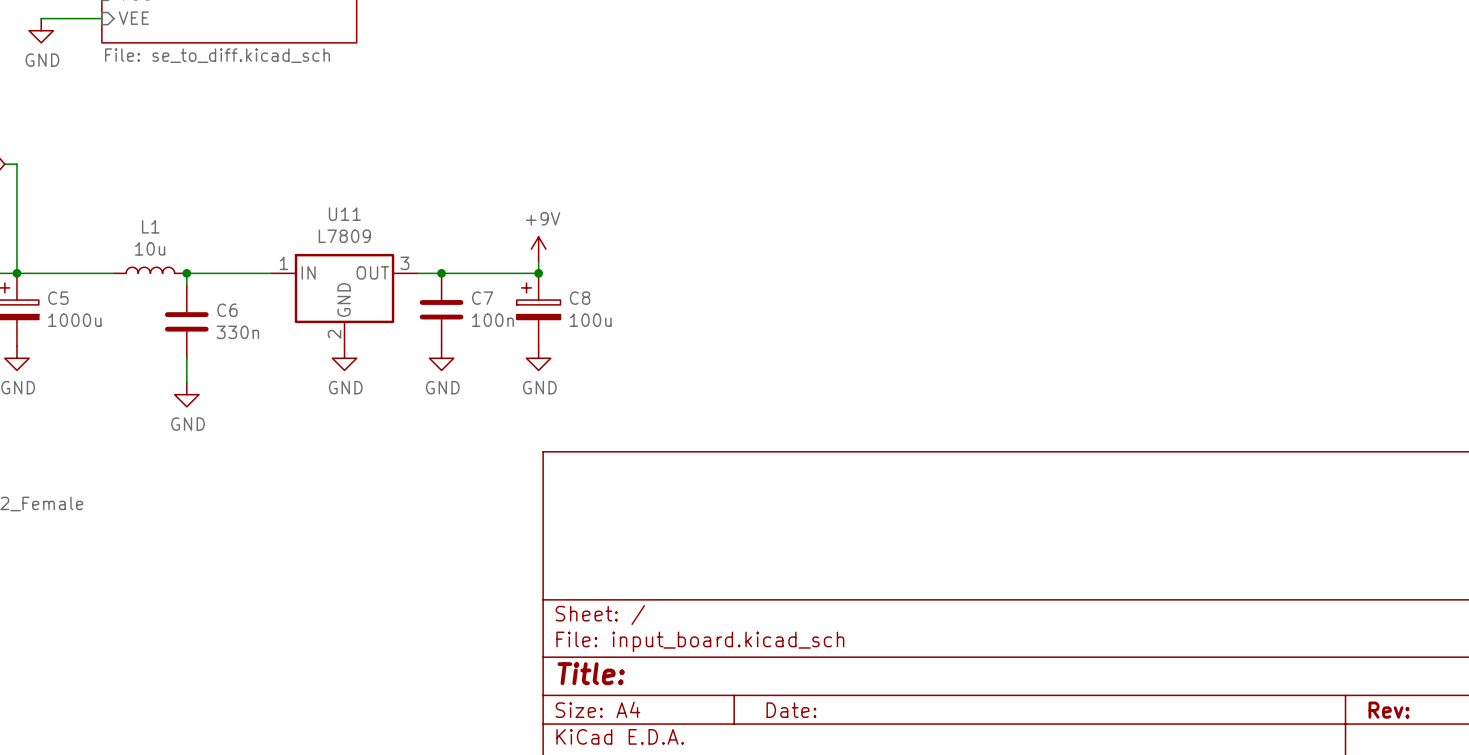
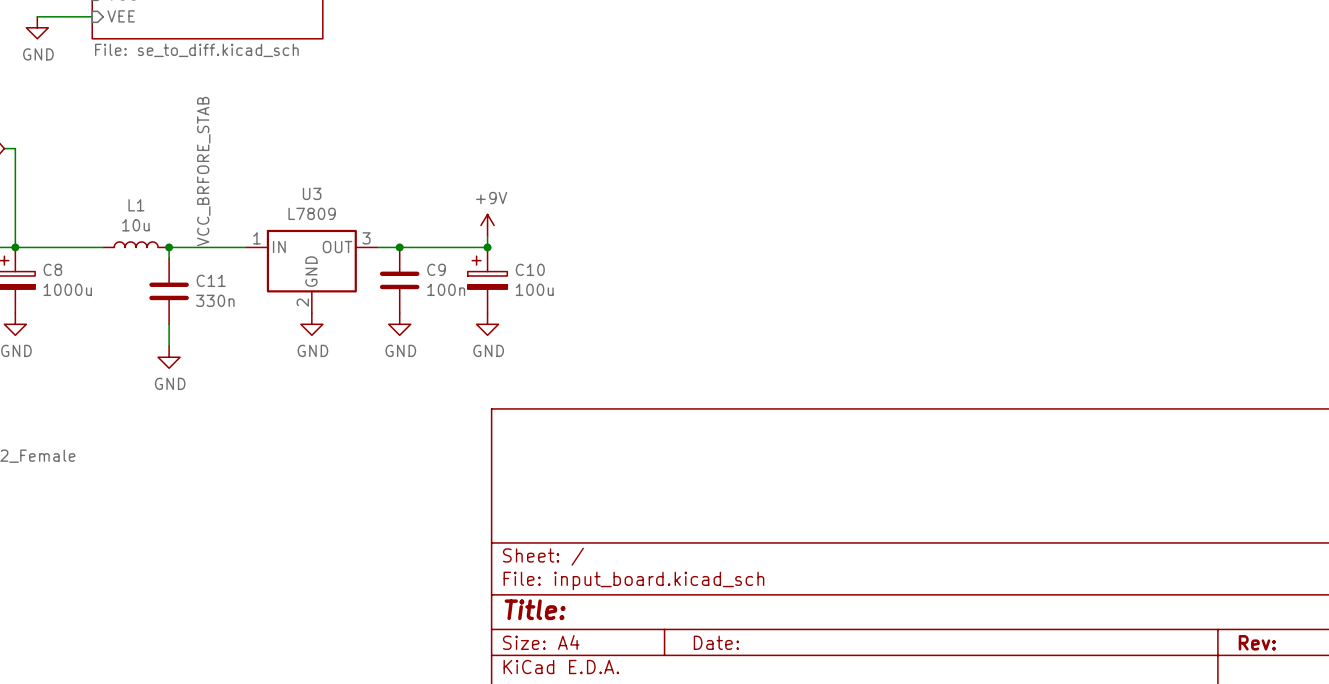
label: none -> VCC_BRFORE_STAB (203, 171)
U11 name: U11 (344, 214) -> U3 (312, 193)
C5 name: C5 (58, 298) -> C8 (52, 269)
C7 name: C7 (482, 298) -> C9 (436, 269)
C8 name: C8 (580, 298) -> C10 (530, 269)
C6 name: C6 (227, 310) -> C11 (211, 280)

